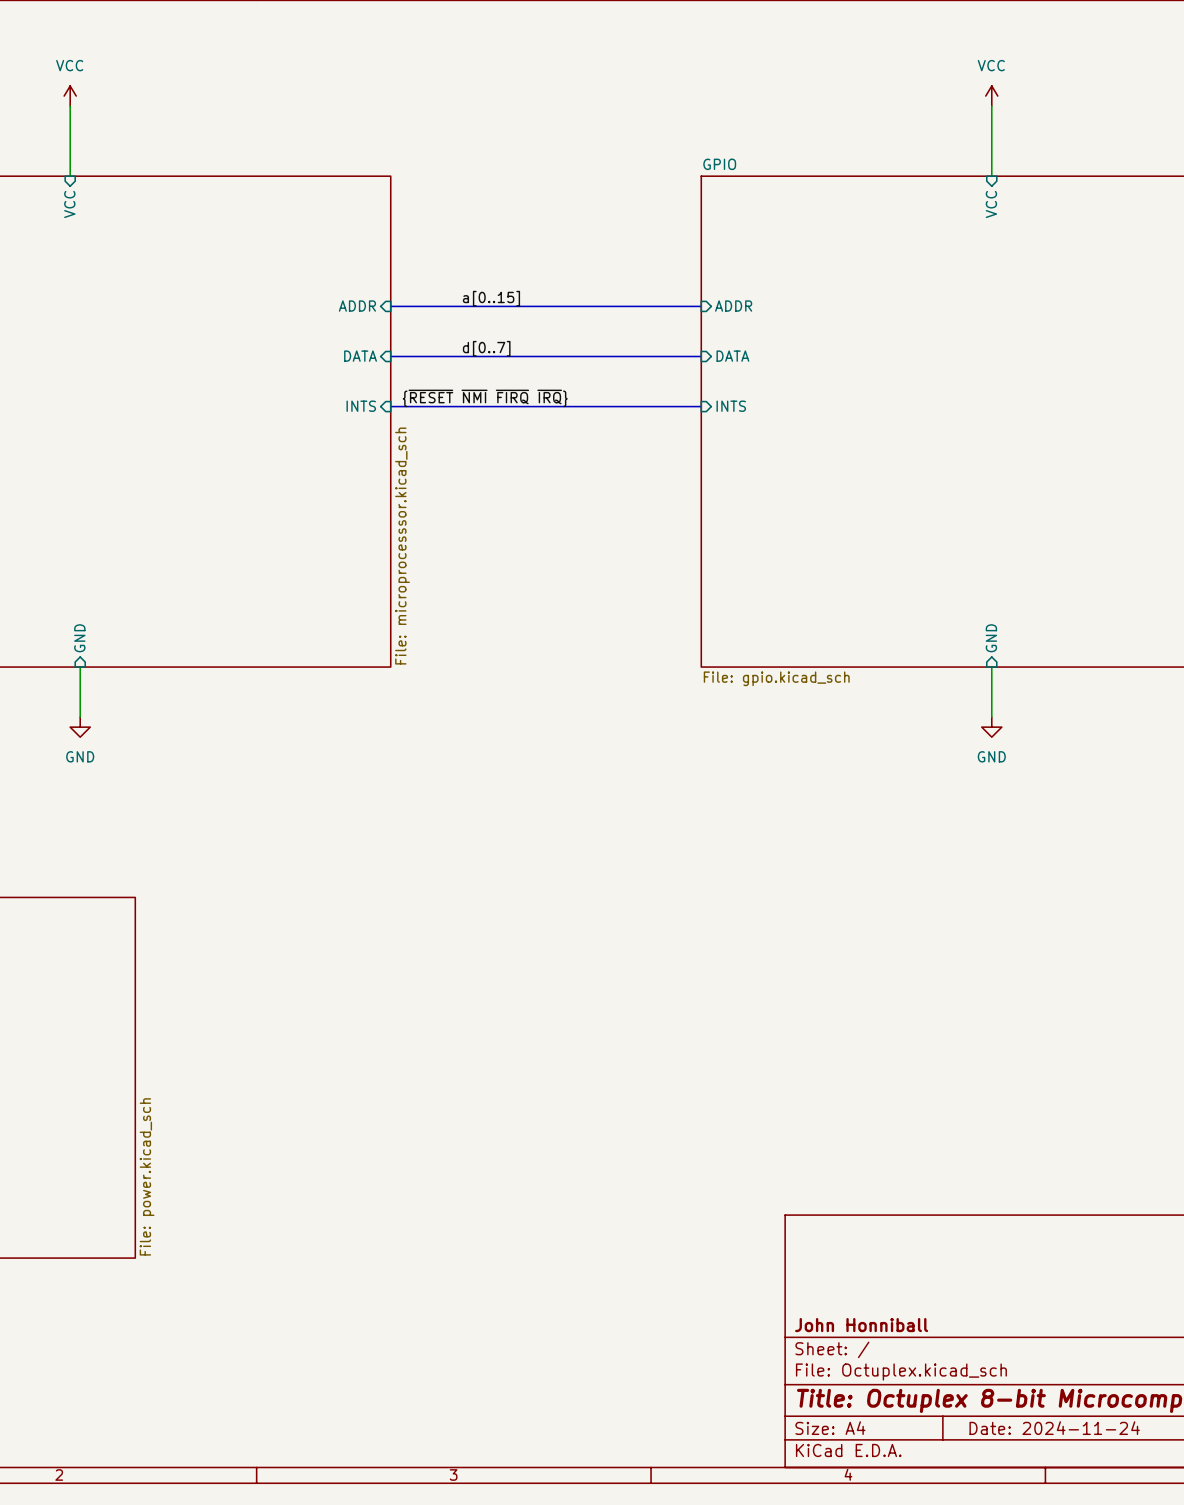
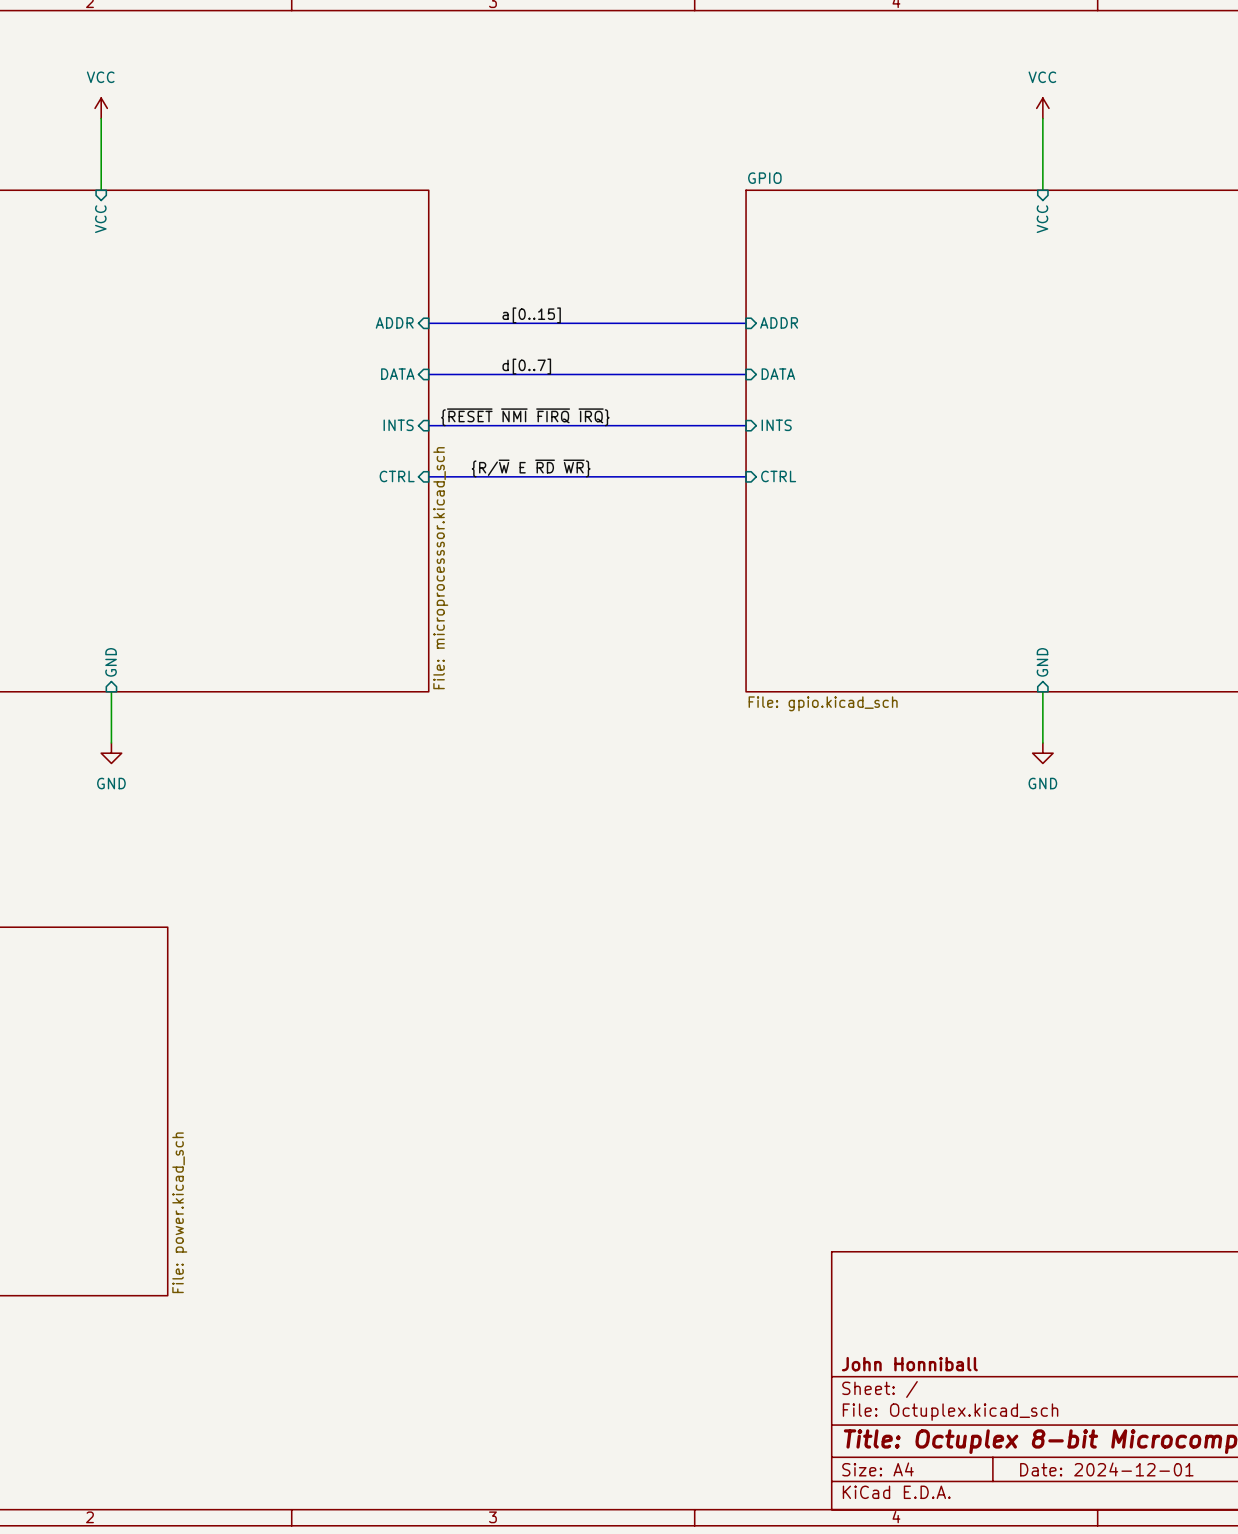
label: none -> {R/~{W} E ~{RD} ~{WR}} (531, 468)
sheet pin: none -> CTRL (397, 476)
bus: none -> (428, 476) (746, 476)
sheet pin: none -> CTRL (778, 476)
title block: Date: 2024-11-24 (1054, 1428) -> Date: 2024-12-01 (1106, 1469)

